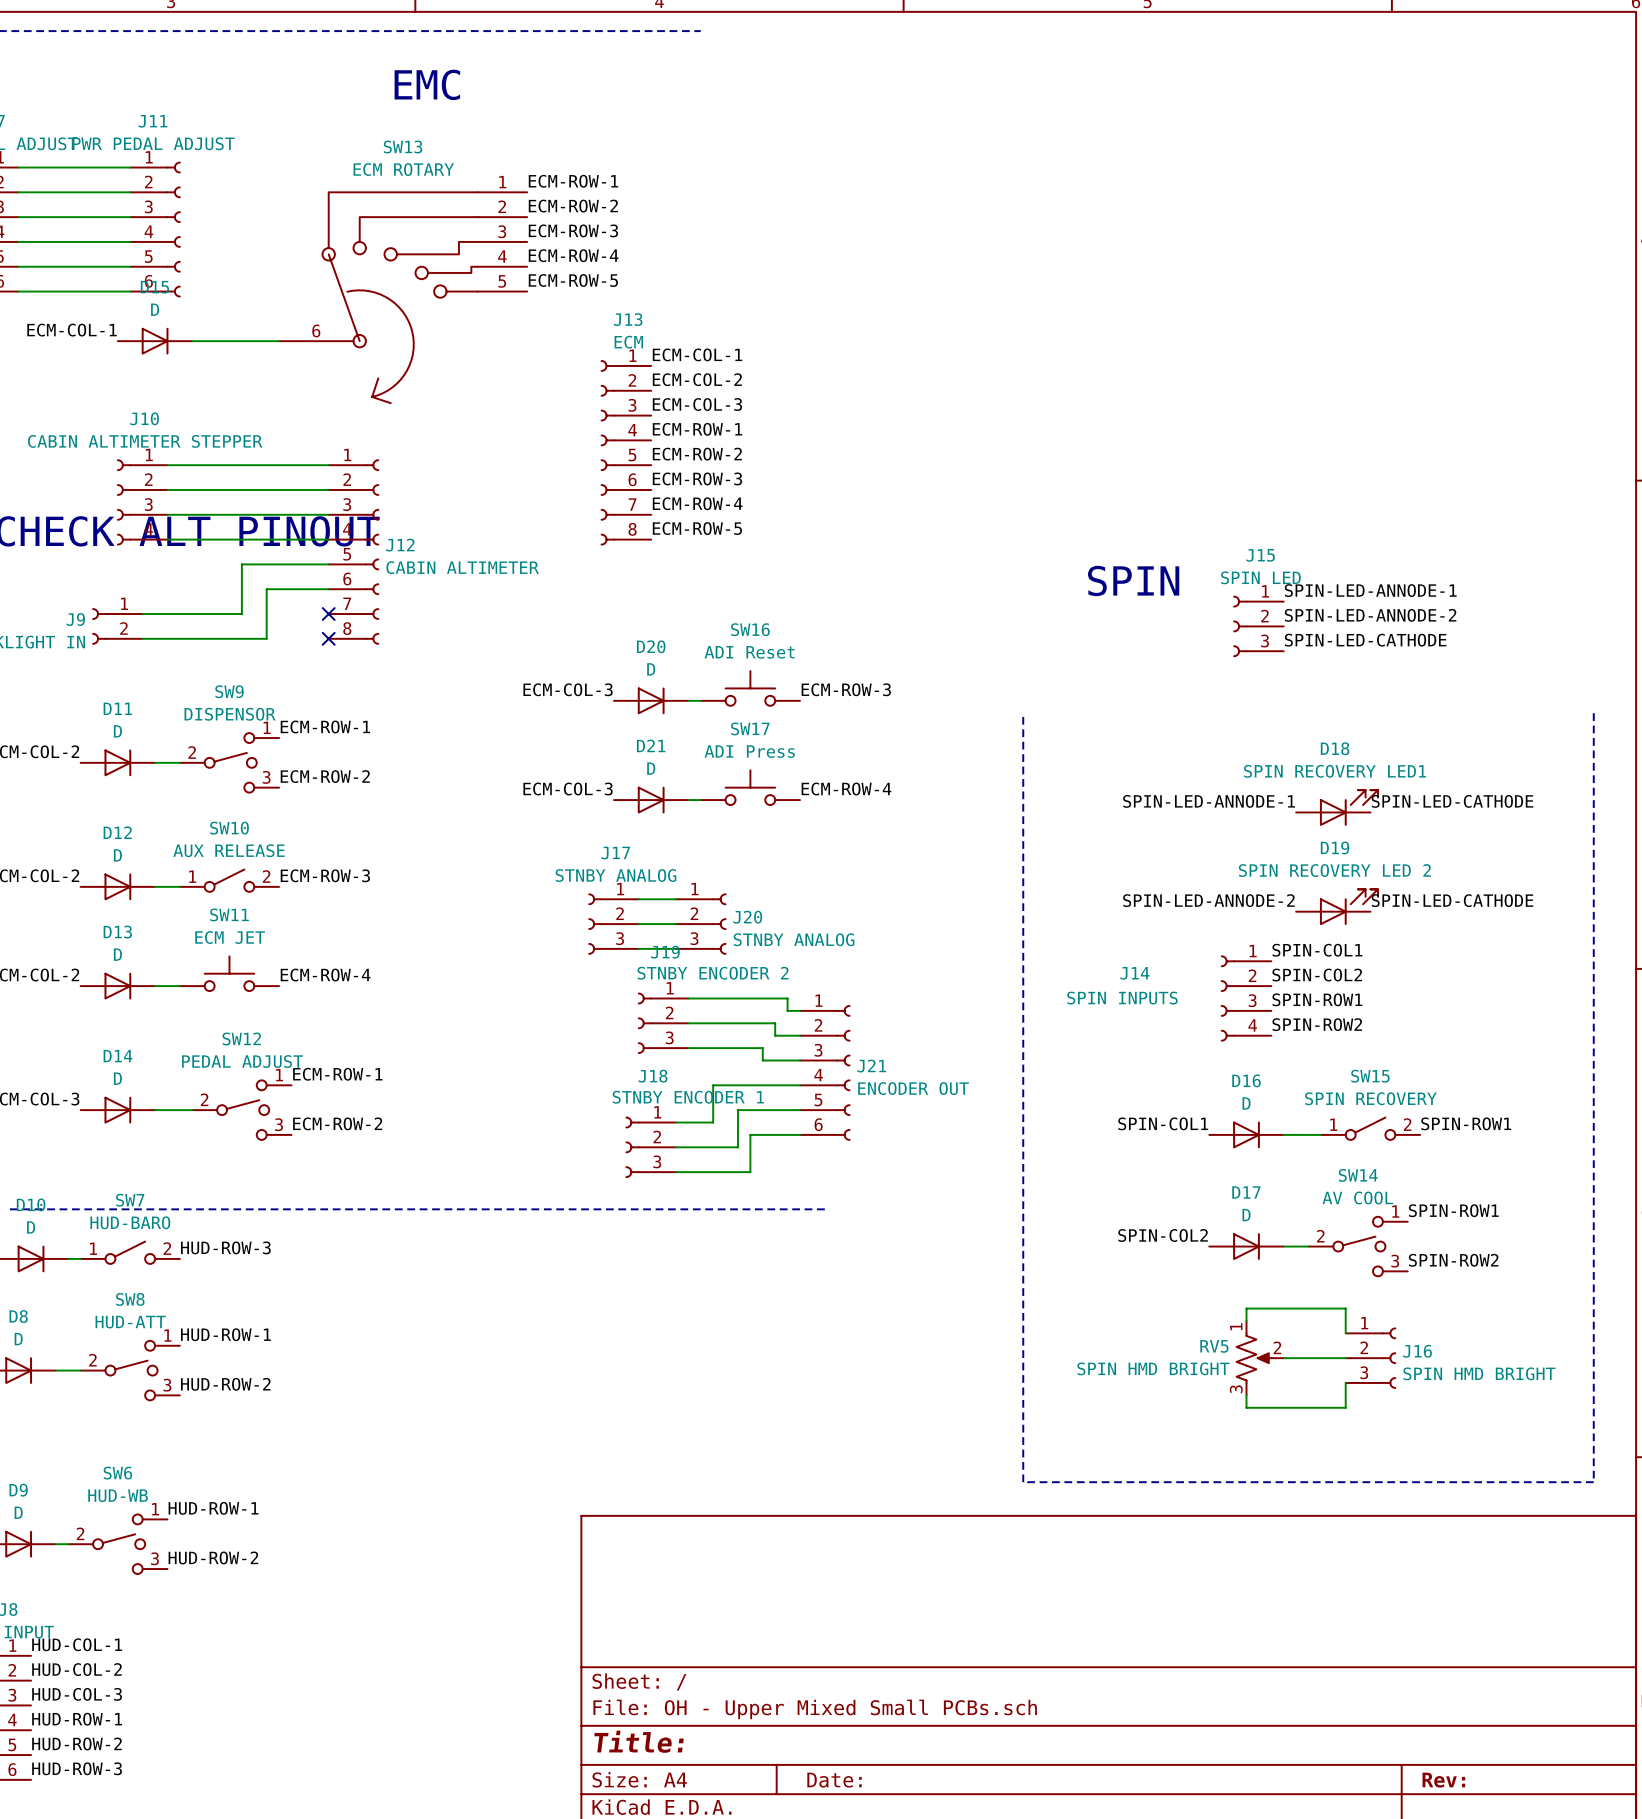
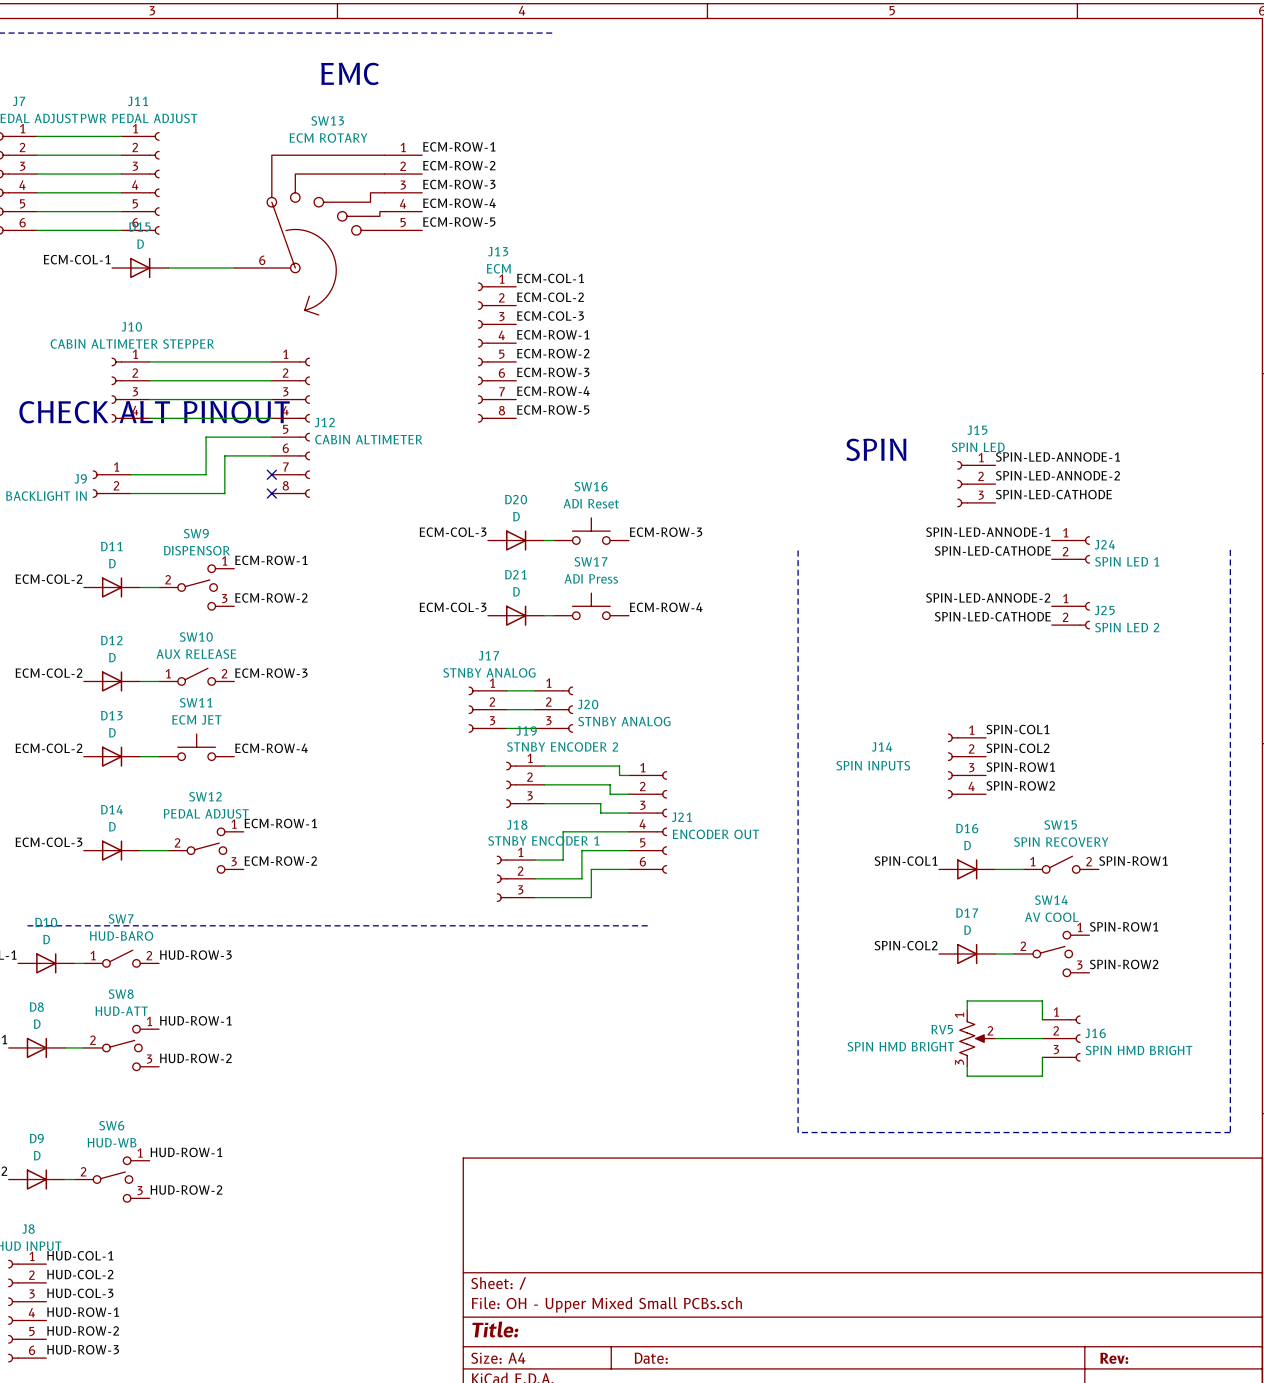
J24: none -> SPIN LED 1 (1070, 549)
label: none -> SPIN-LED-CATHODE (992, 550)
J25: none -> SPIN LED 2 (1070, 615)
label position: SPIN-LED-ANNODE-1 (1209, 801) -> SPIN-LED-ANNODE-1 (988, 532)
label position: SPIN-LED-CATHODE (1452, 801) -> SPIN-LED-CATHODE (992, 616)
D18: SPIN RECOVERY LED1 (1337, 807) -> none
label position: SPIN-LED-ANNODE-2 (1208, 900) -> SPIN-LED-ANNODE-2 (988, 597)
label: SPIN-LED-CATHODE (1452, 900) -> none
D19: SPIN RECOVERY LED 2 (1337, 907) -> none

